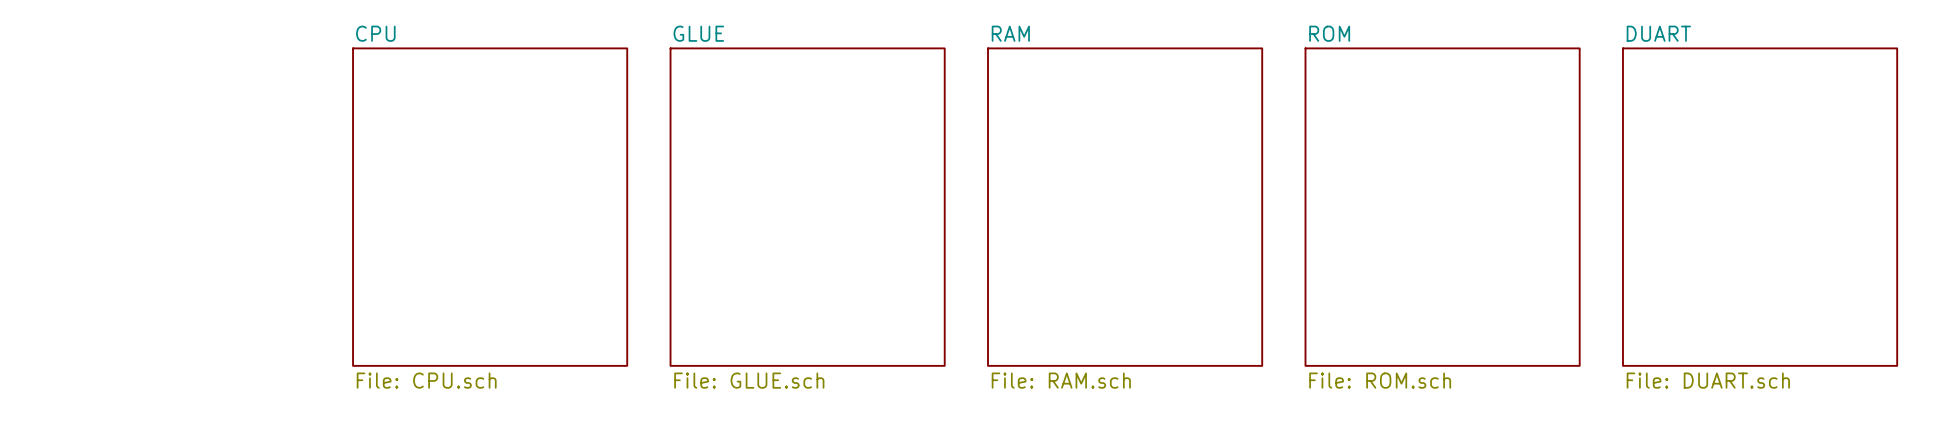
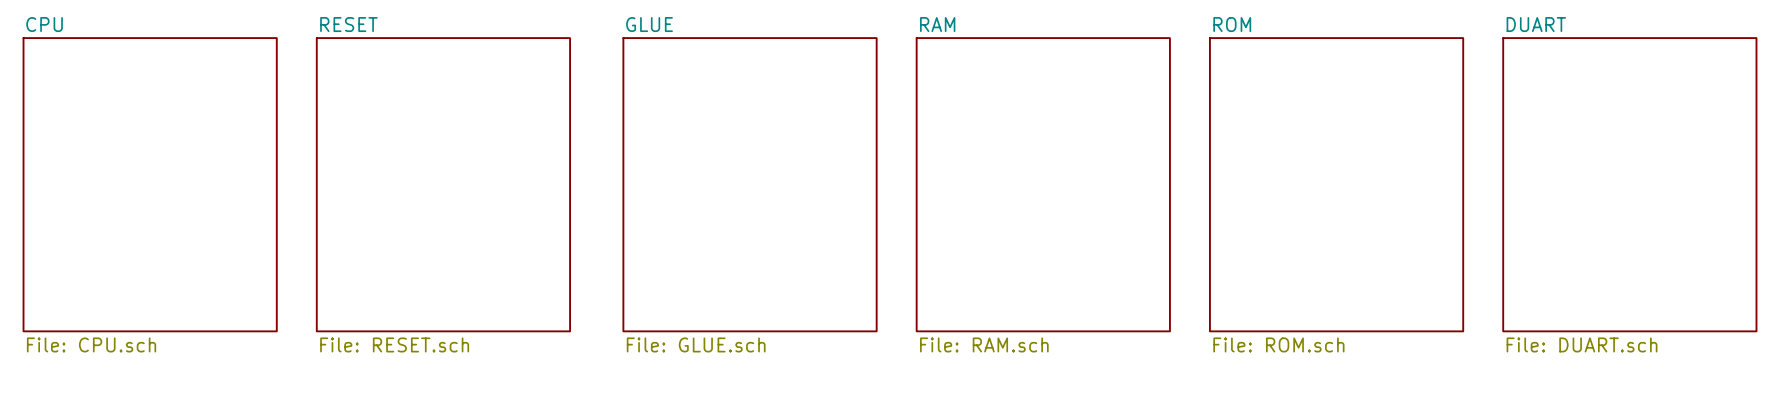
sheet CPU: none -> File: CPU.sch (150, 184)
sheet RESET: none -> File: RESET.sch (443, 184)
sheet CPU: File: CPU.sch (490, 207) -> none

